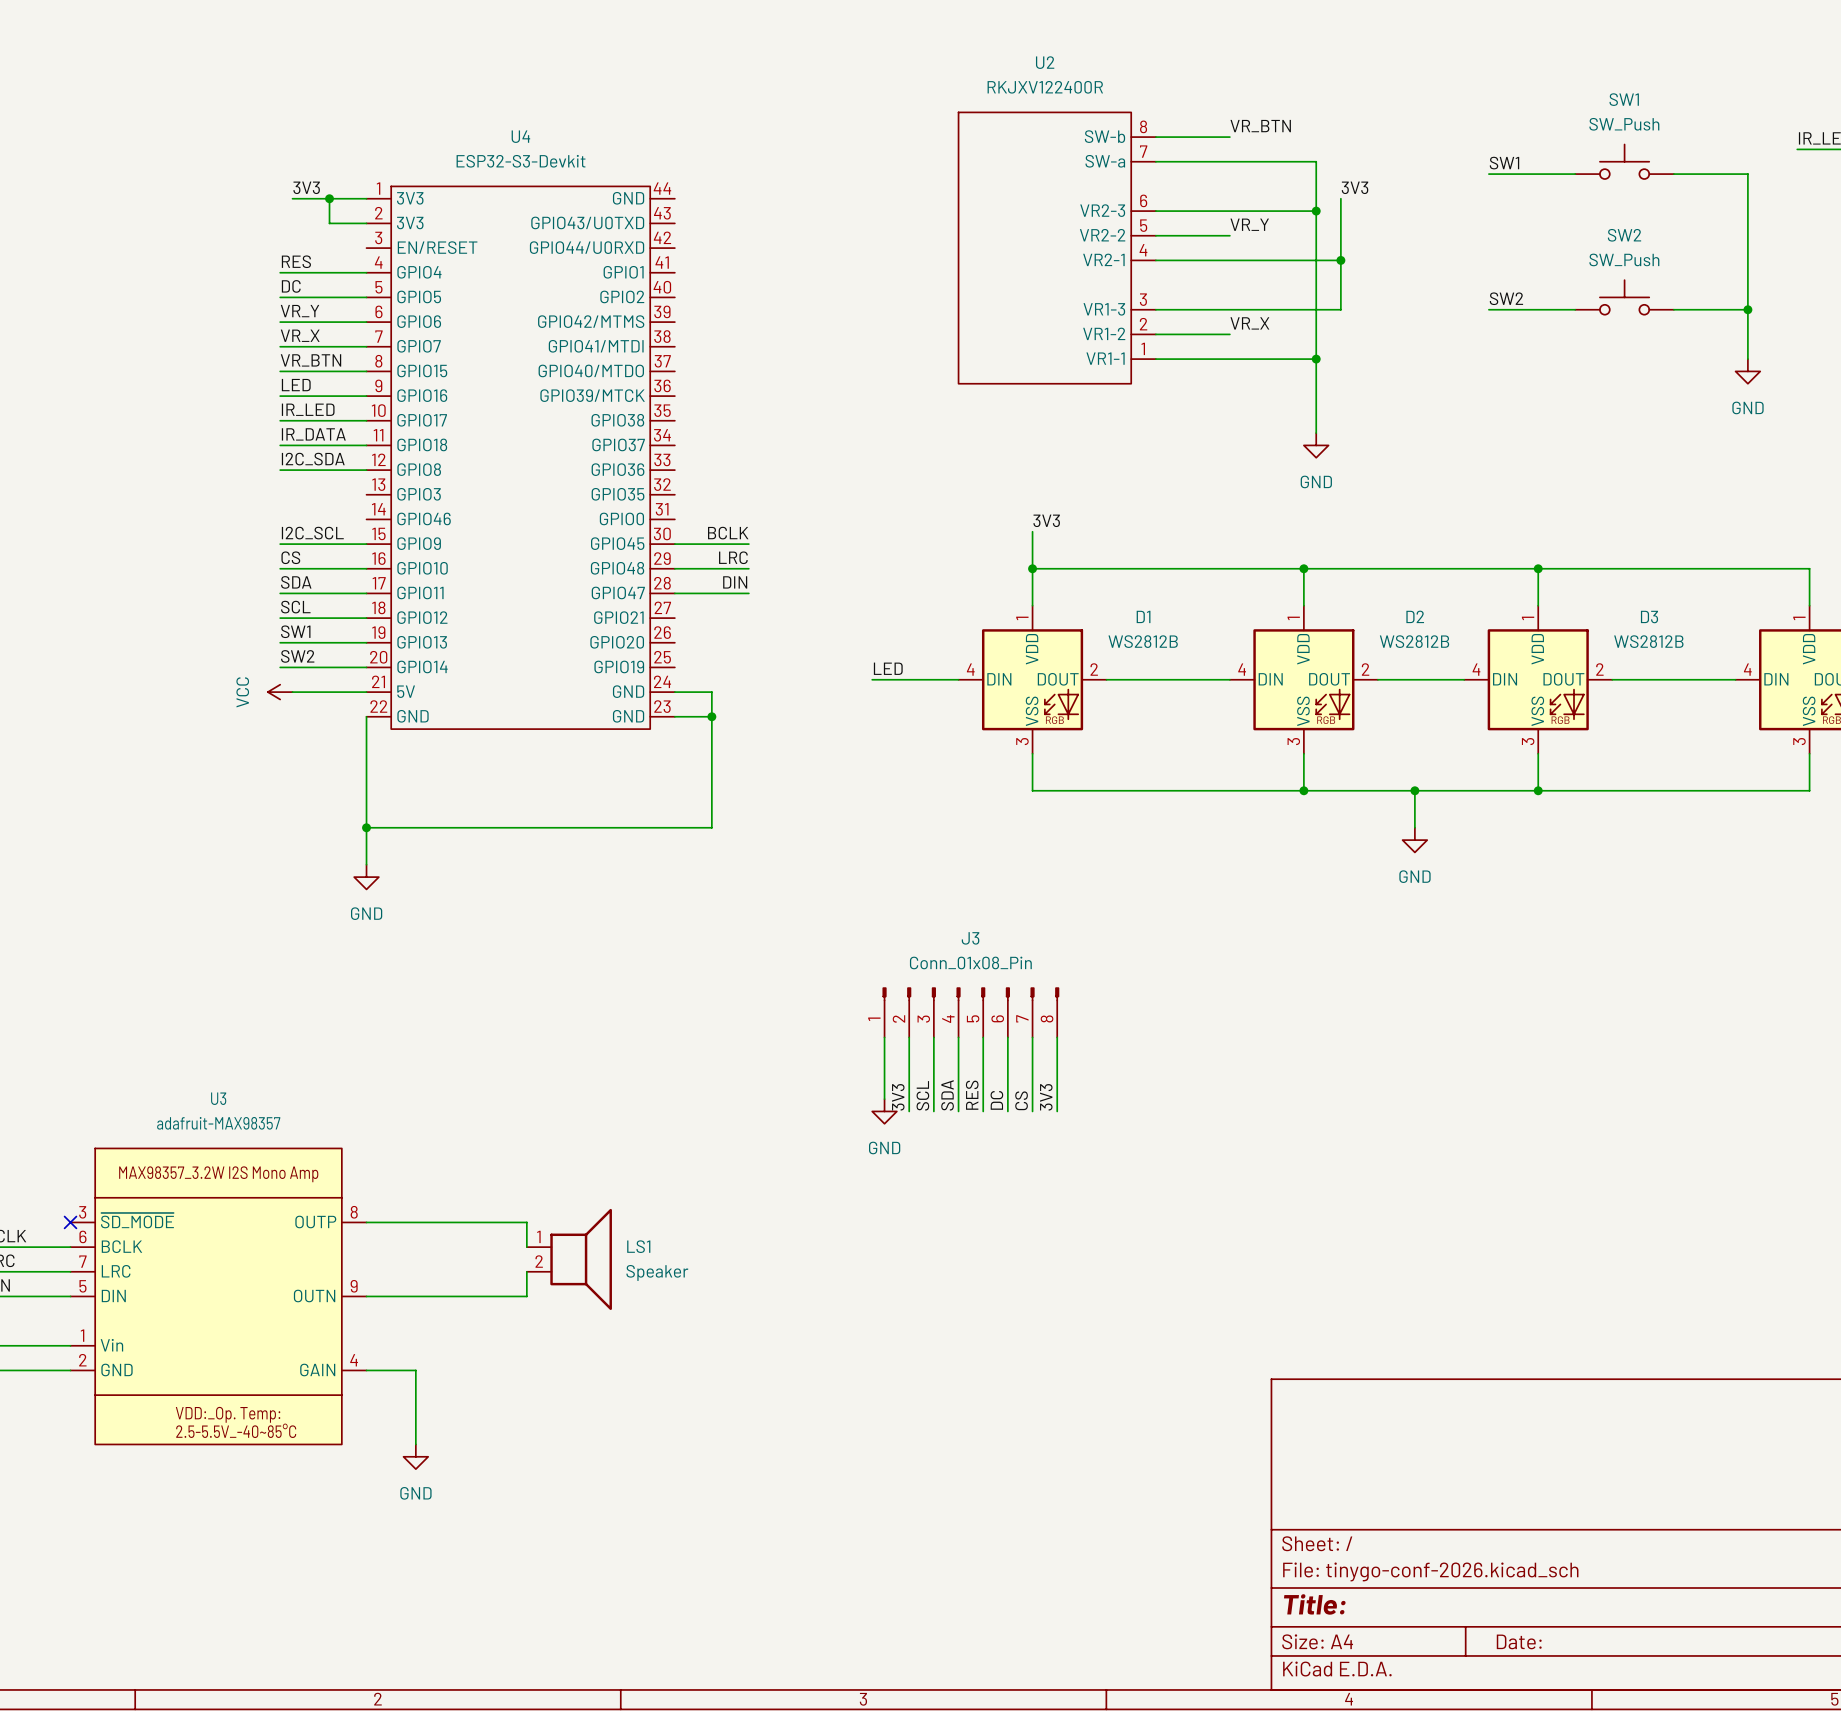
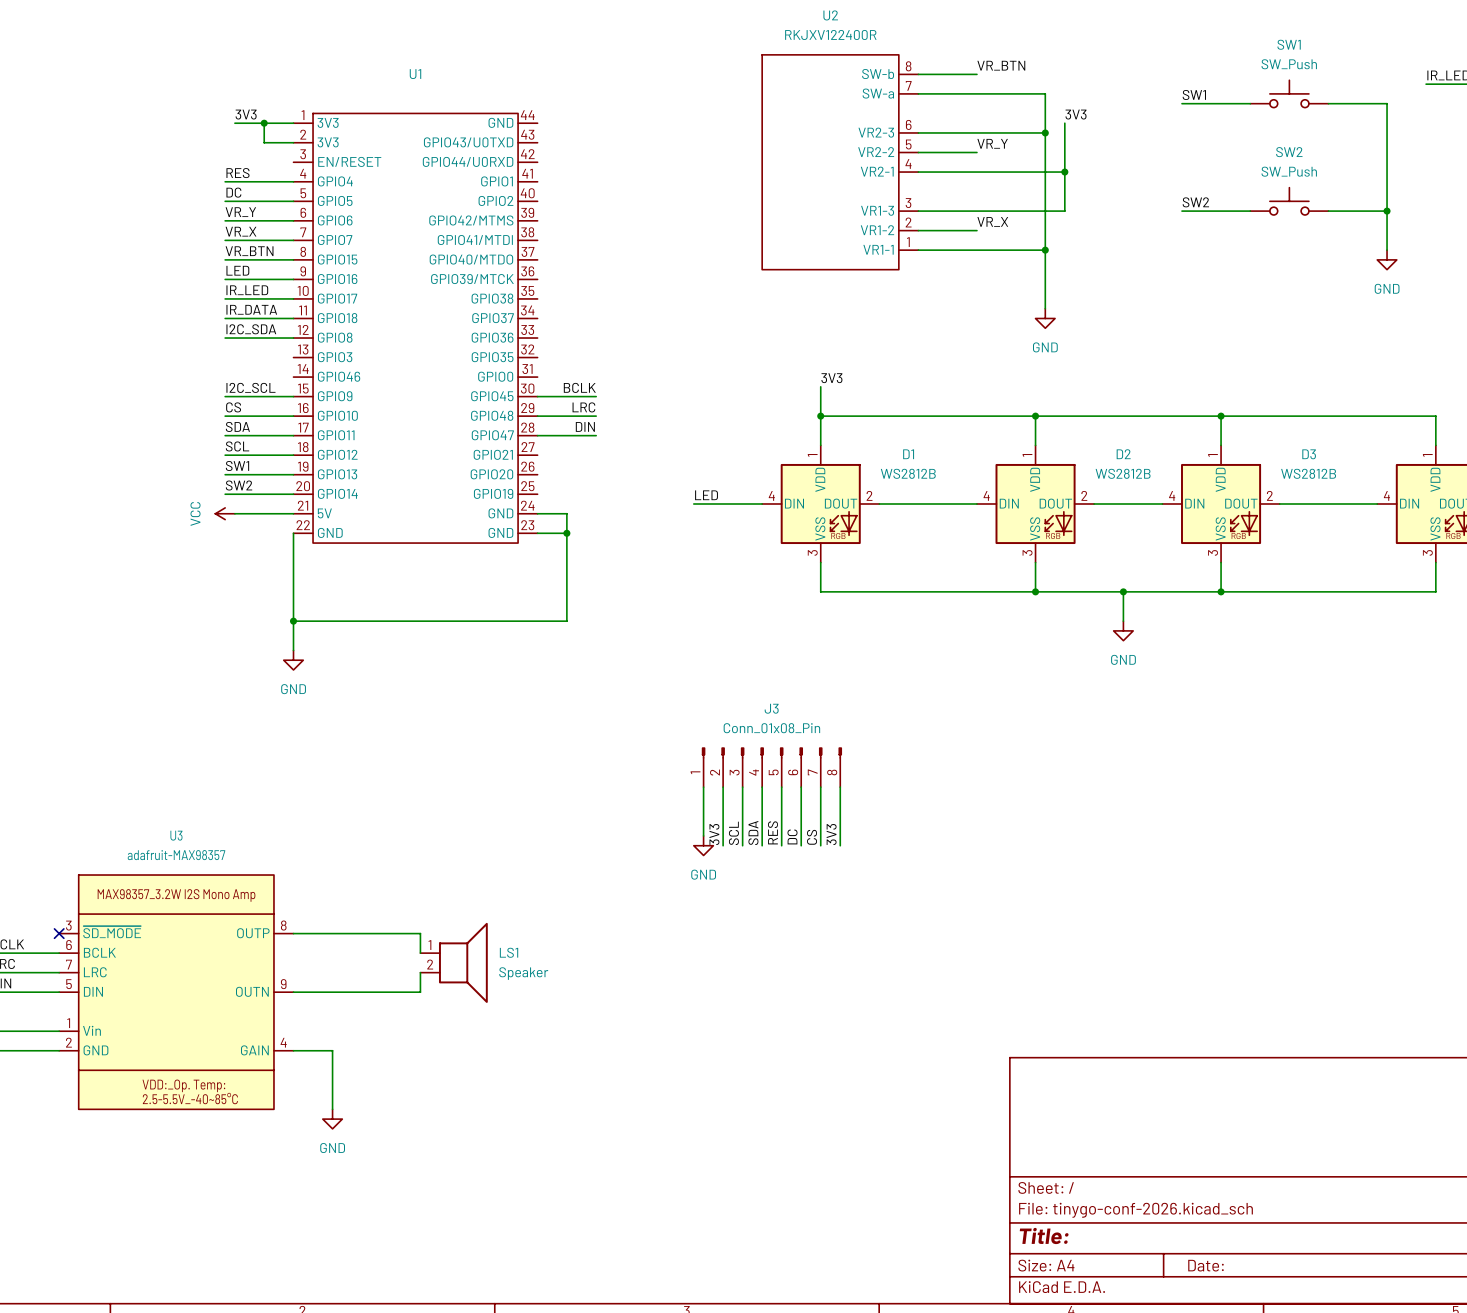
U4 name: U4 (520, 136) -> U1 (415, 74)
U4 value: ESP32-S3-Devkit (521, 161) -> none

